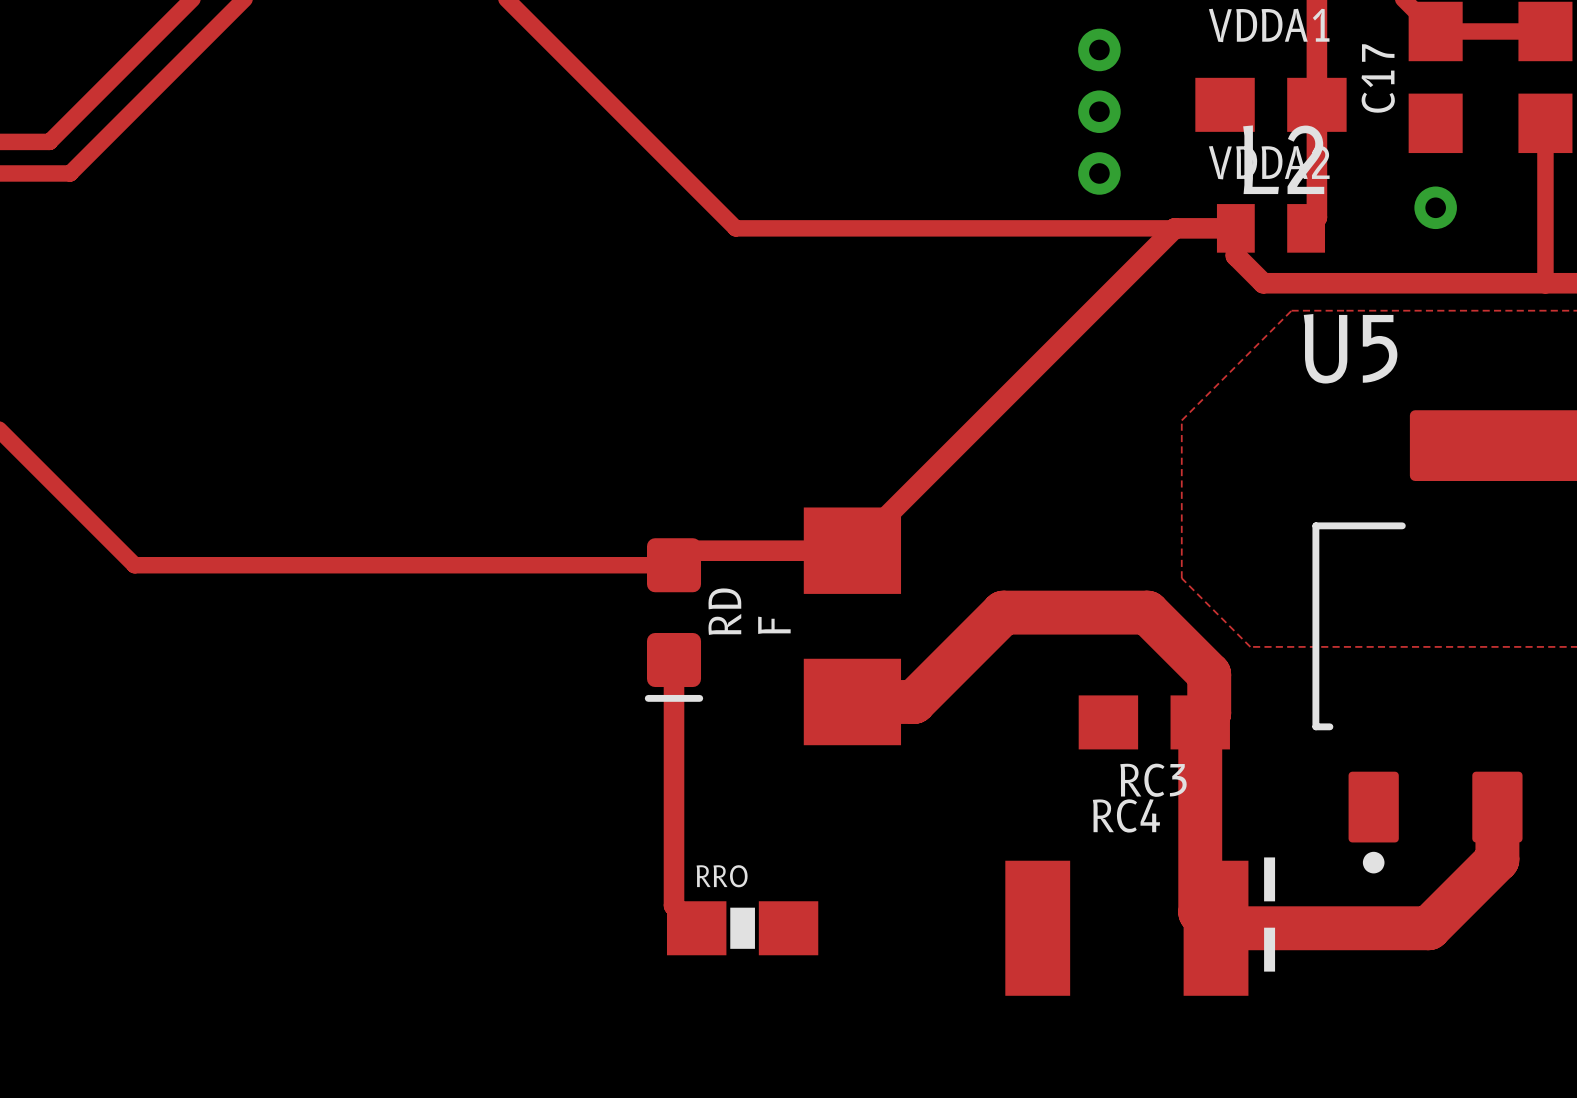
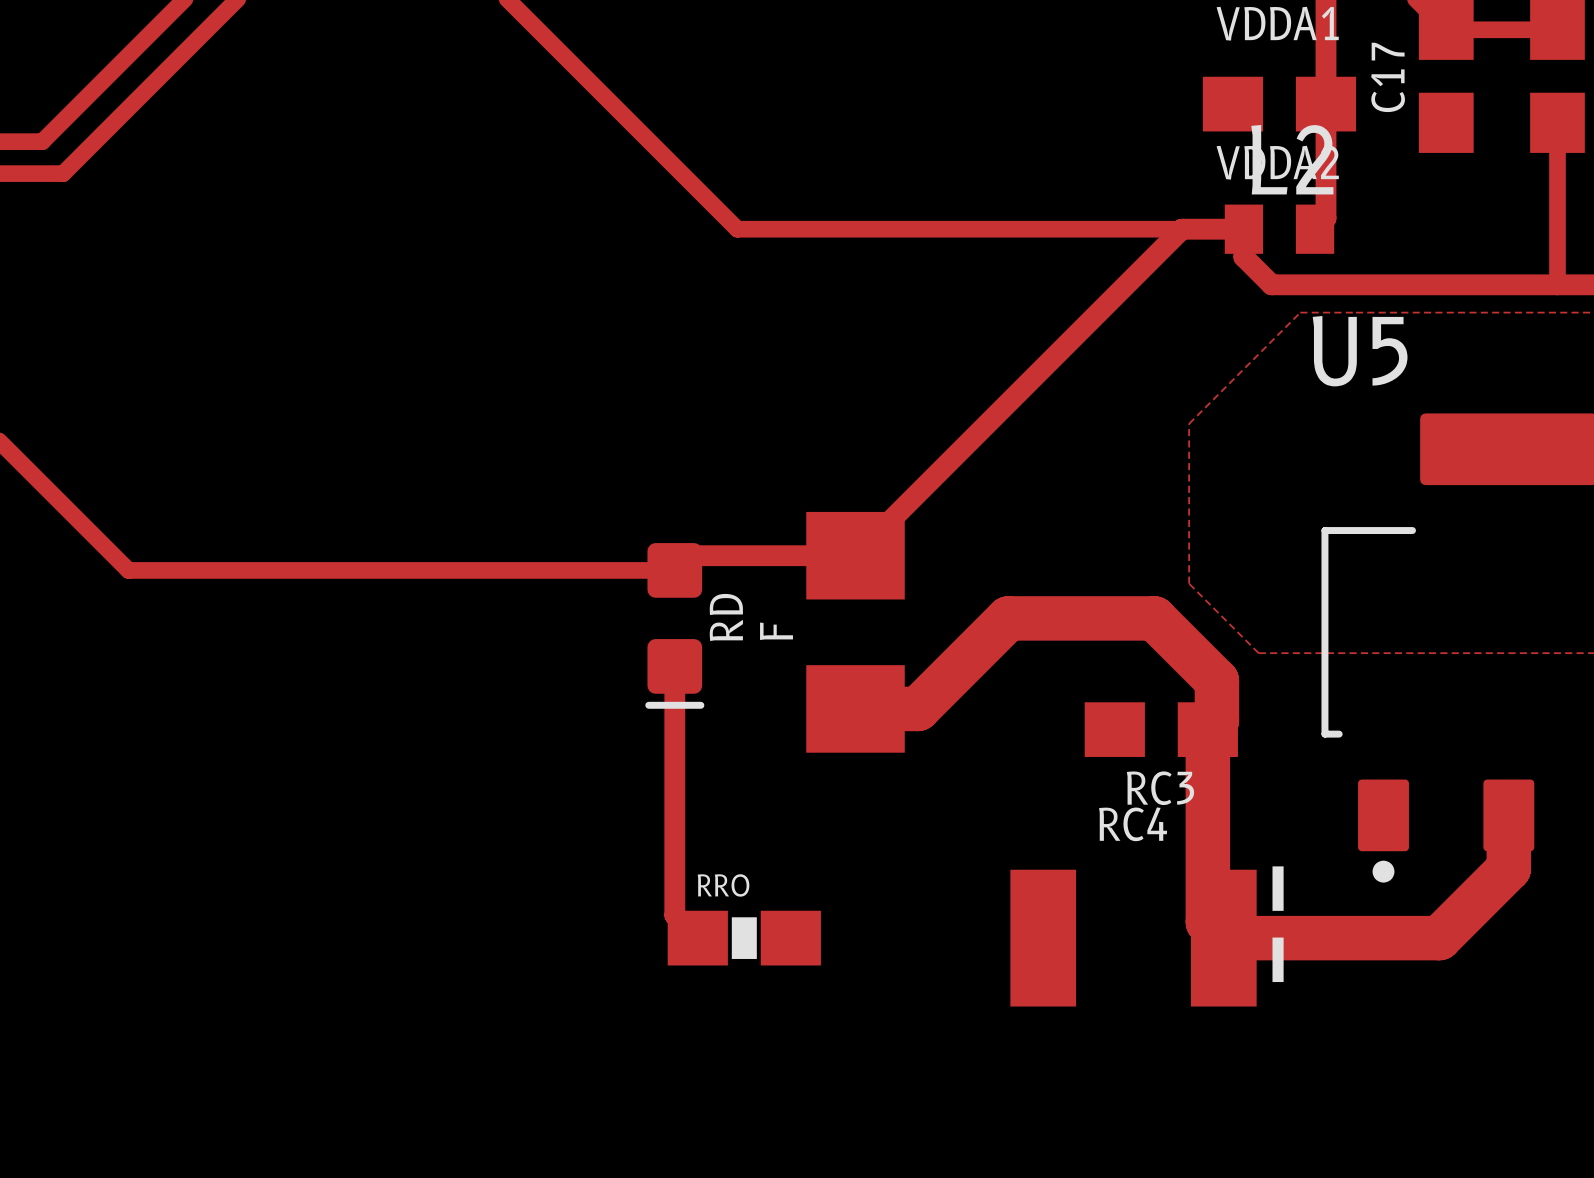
via: (1099, 49) -> none
via: (1099, 111) -> none
via: (1099, 173) -> none
via: (1435, 207) -> none

